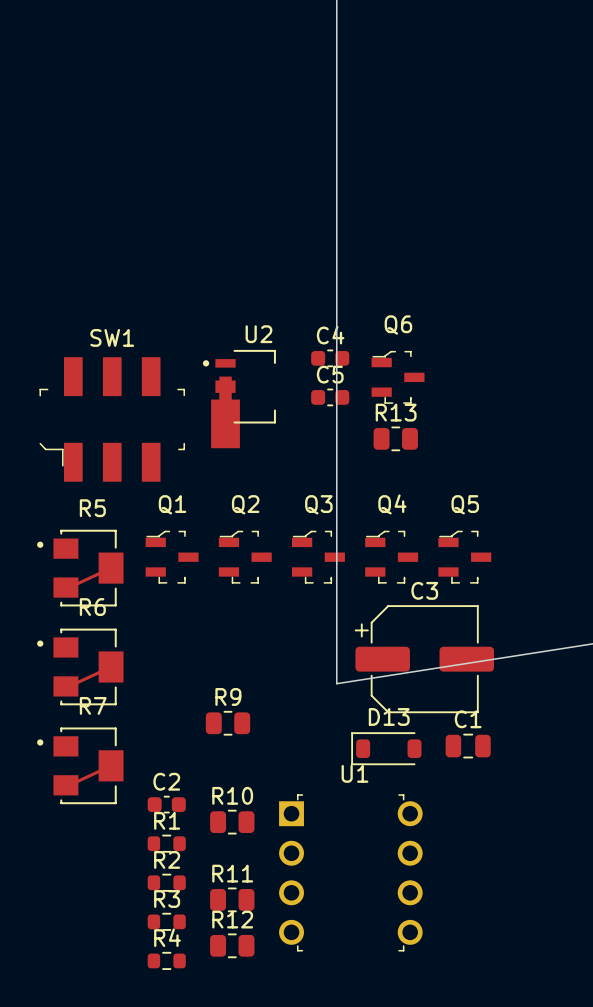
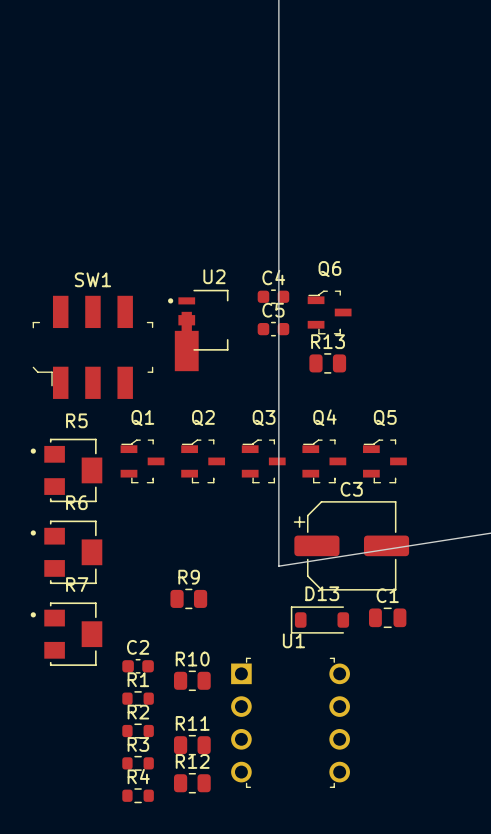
R5 footprint: [37, 529, 124, 607] -> [30, 438, 103, 503]
R6 footprint: [37, 628, 124, 706] -> [30, 520, 103, 585]
R7 footprint: [37, 727, 124, 805] -> [30, 602, 103, 666]

